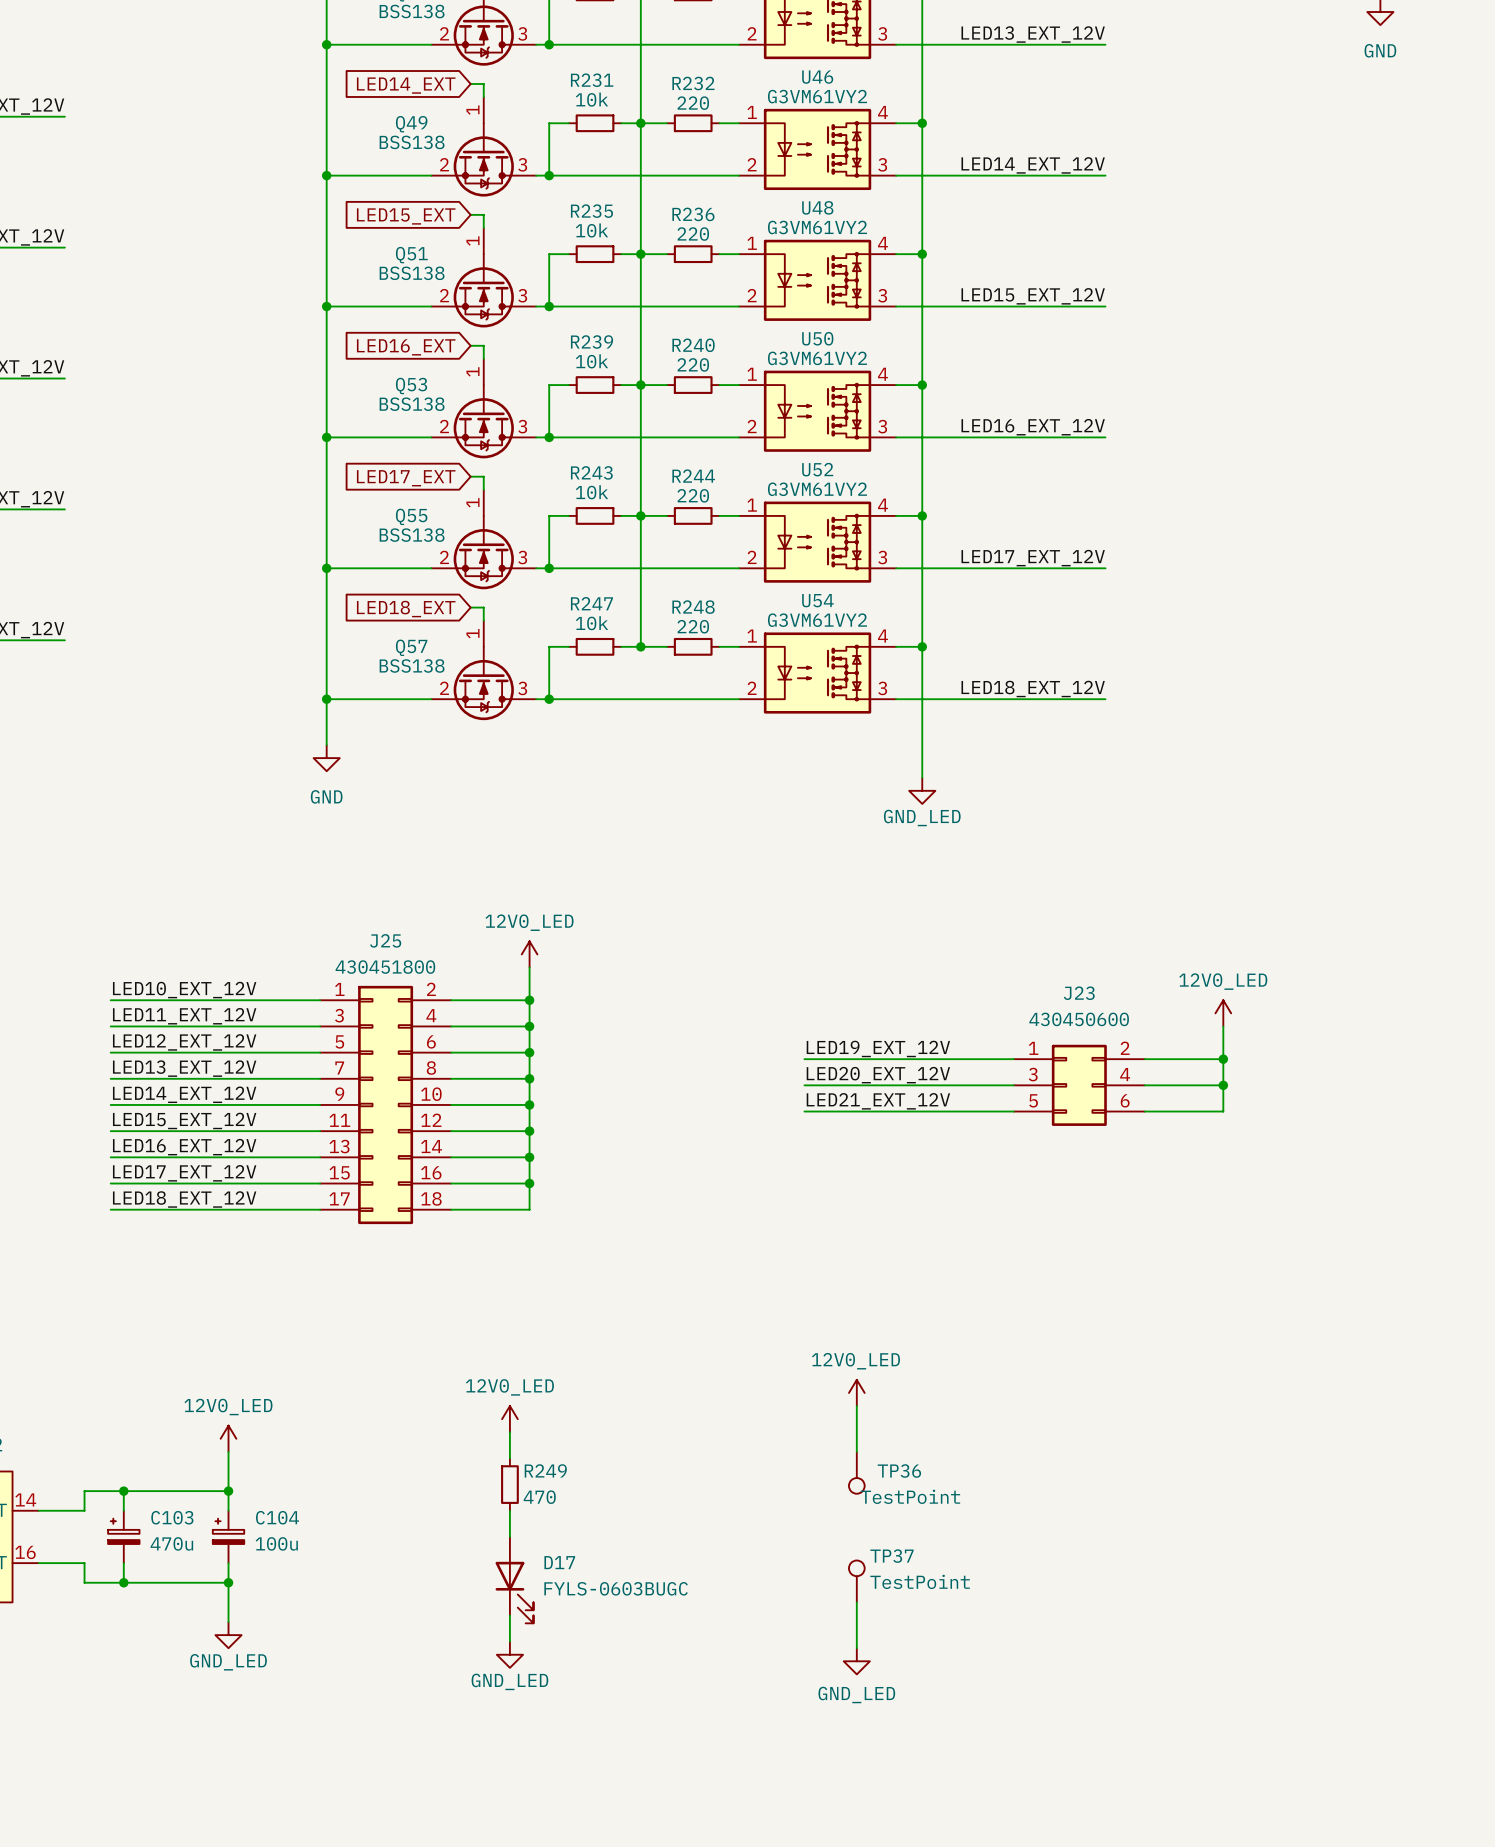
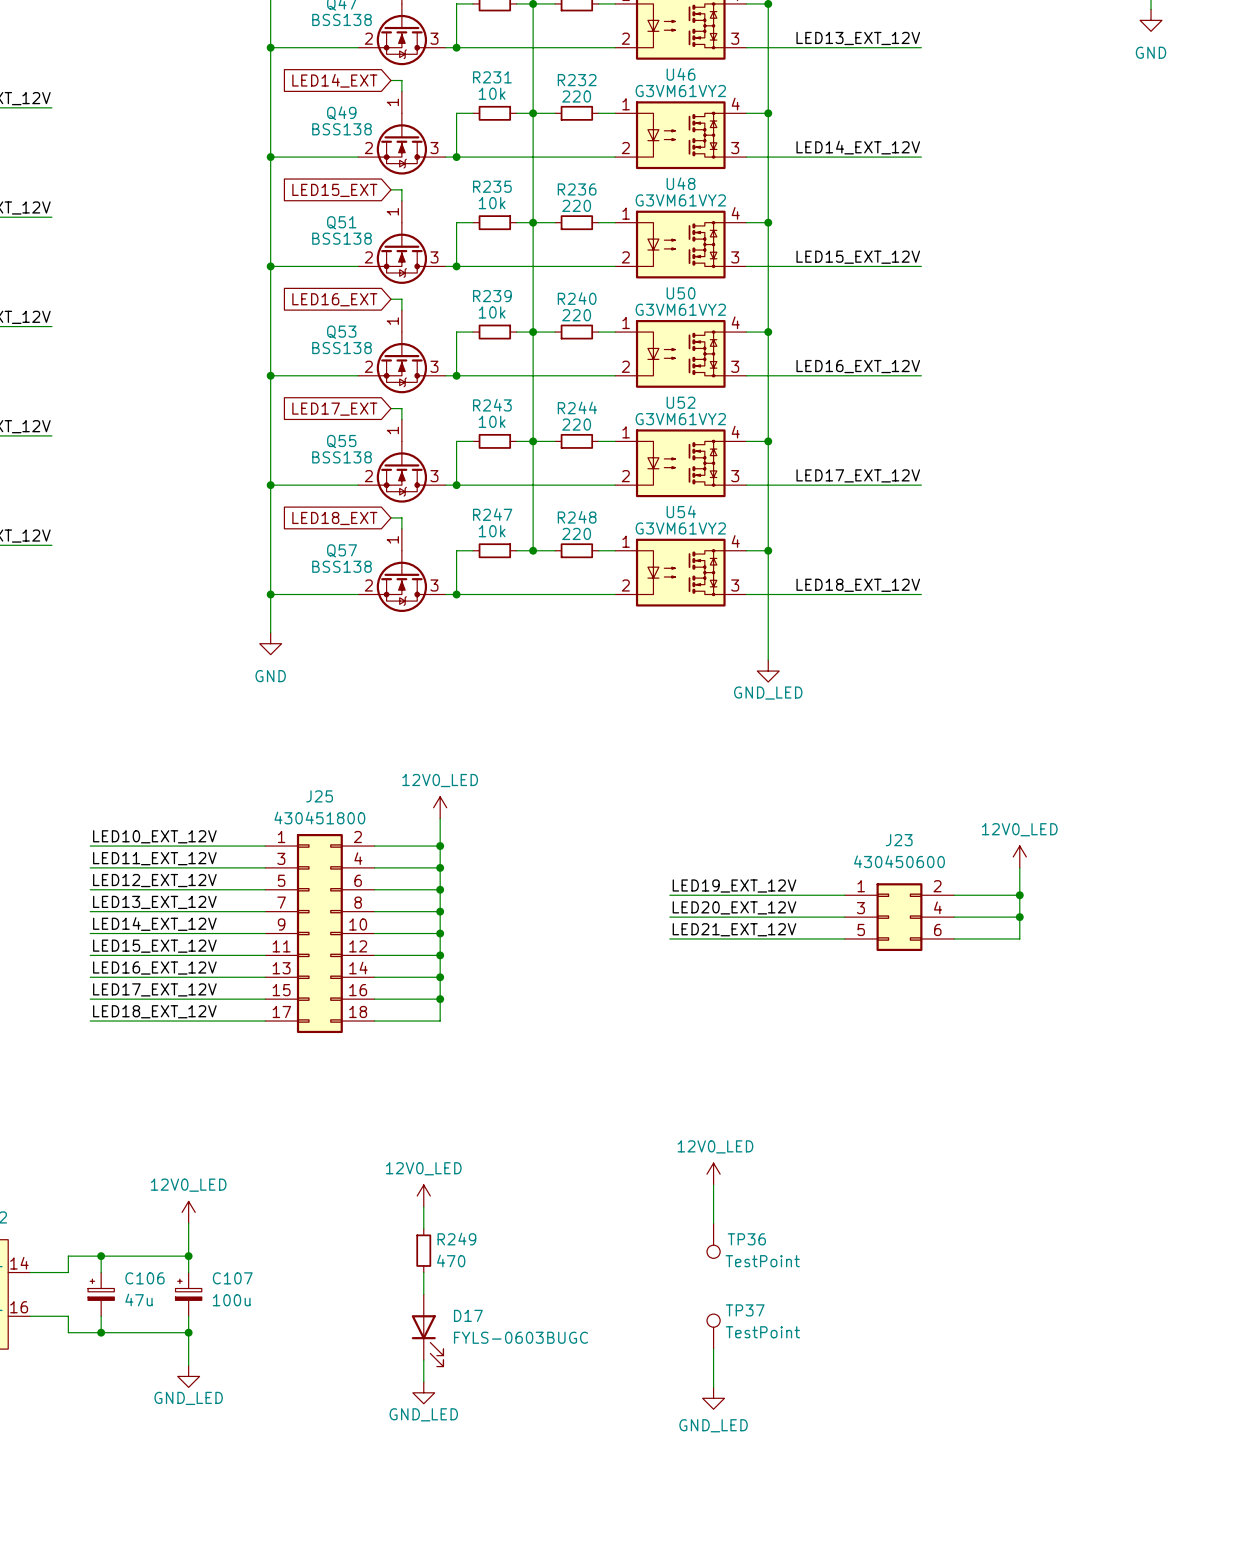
C103 name: C103 (172, 1517) -> C106 (144, 1278)
C104 name: C104 (277, 1517) -> C107 (232, 1278)
C103 value: 470u (171, 1543) -> 47u (138, 1299)

